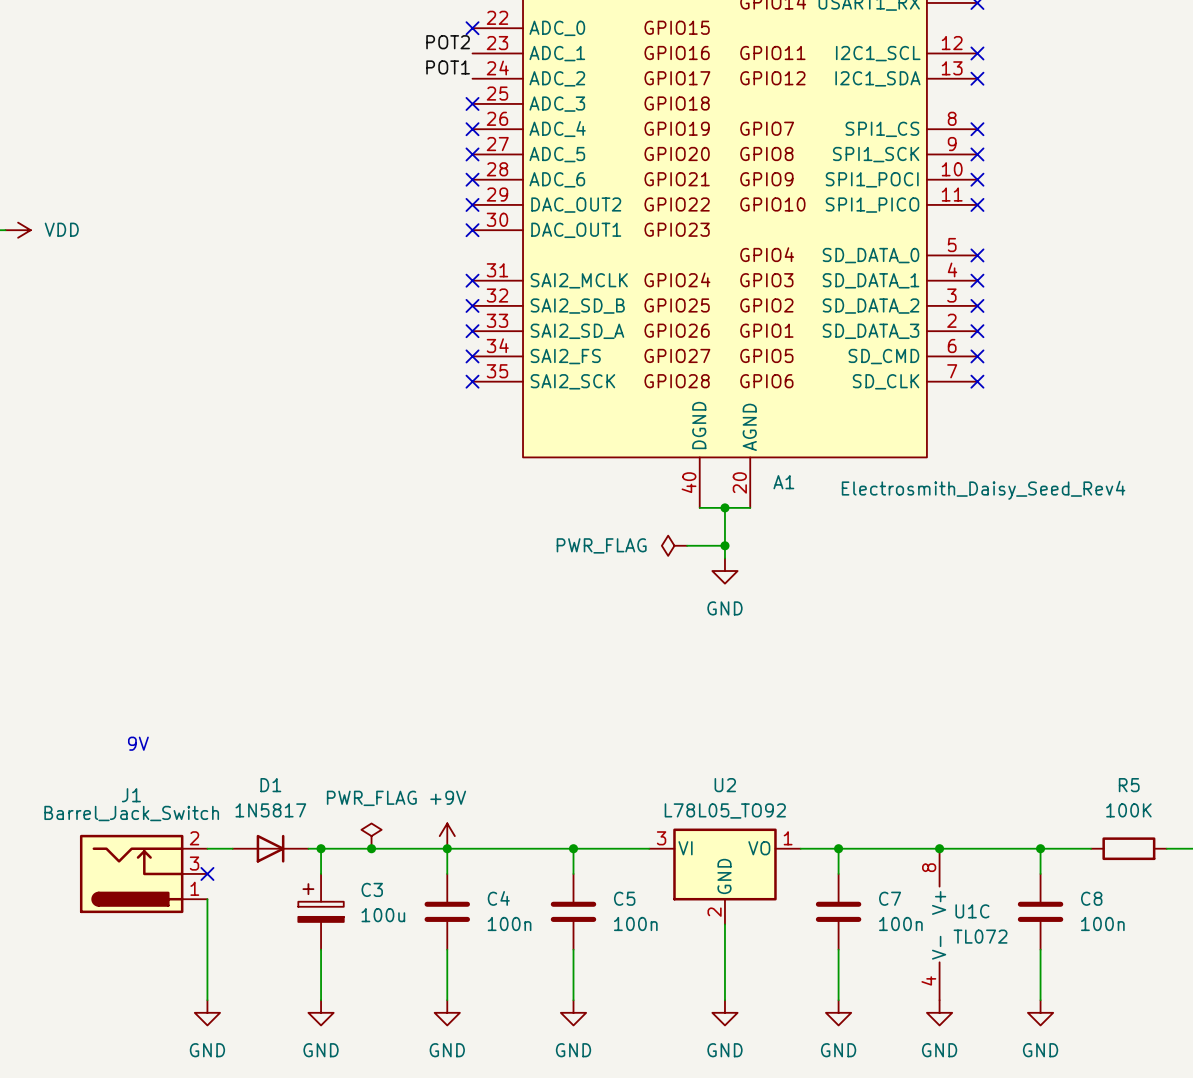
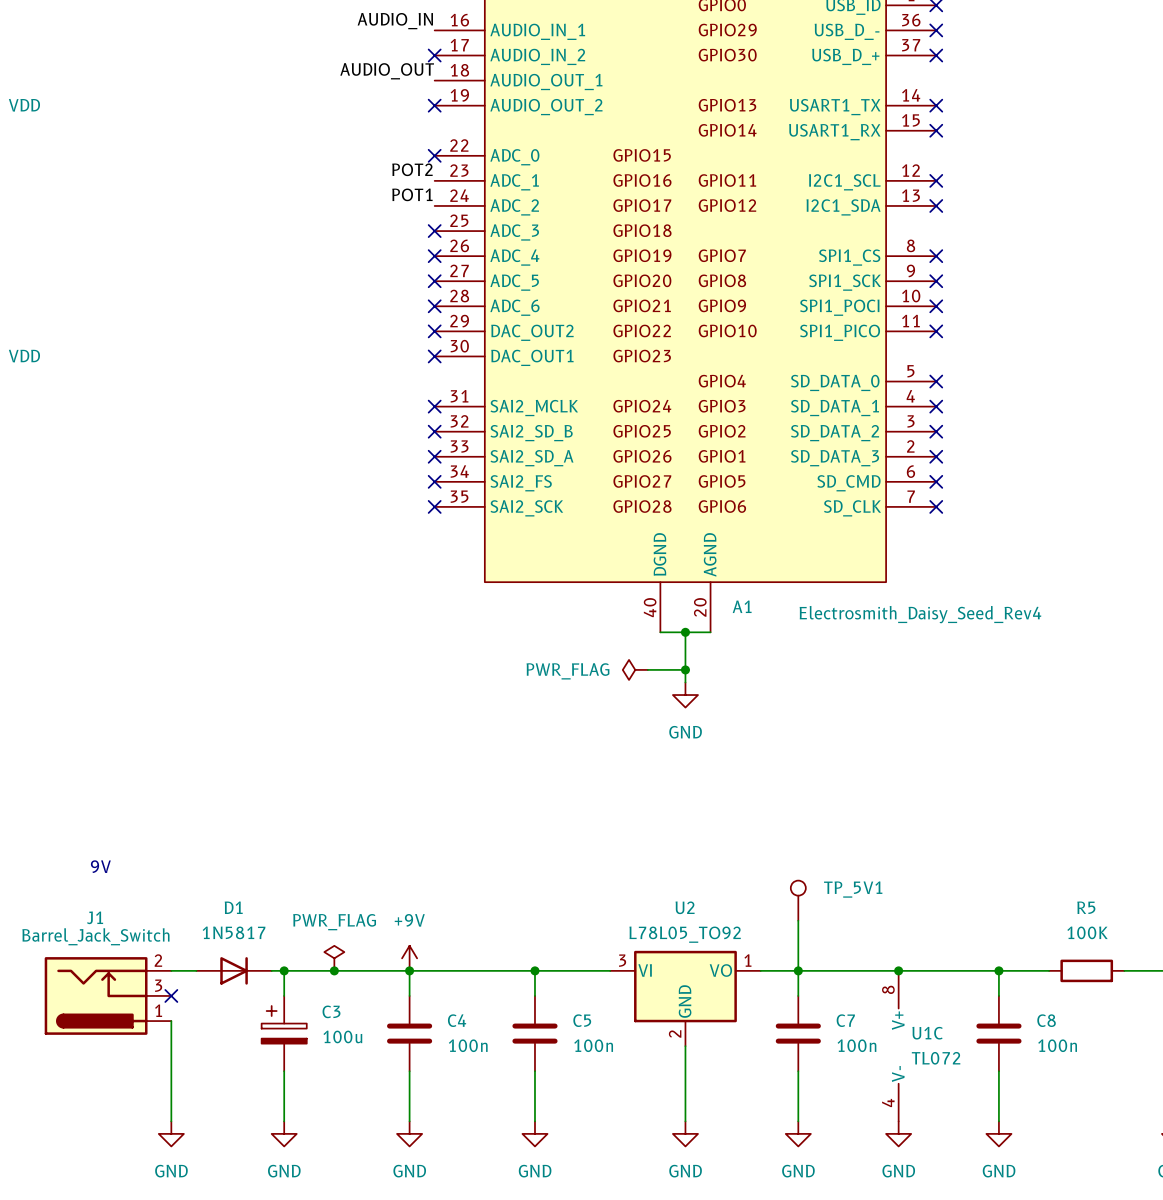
TP_5V1: none -> (798, 900)
wire: none -> (798, 920) (798, 970)

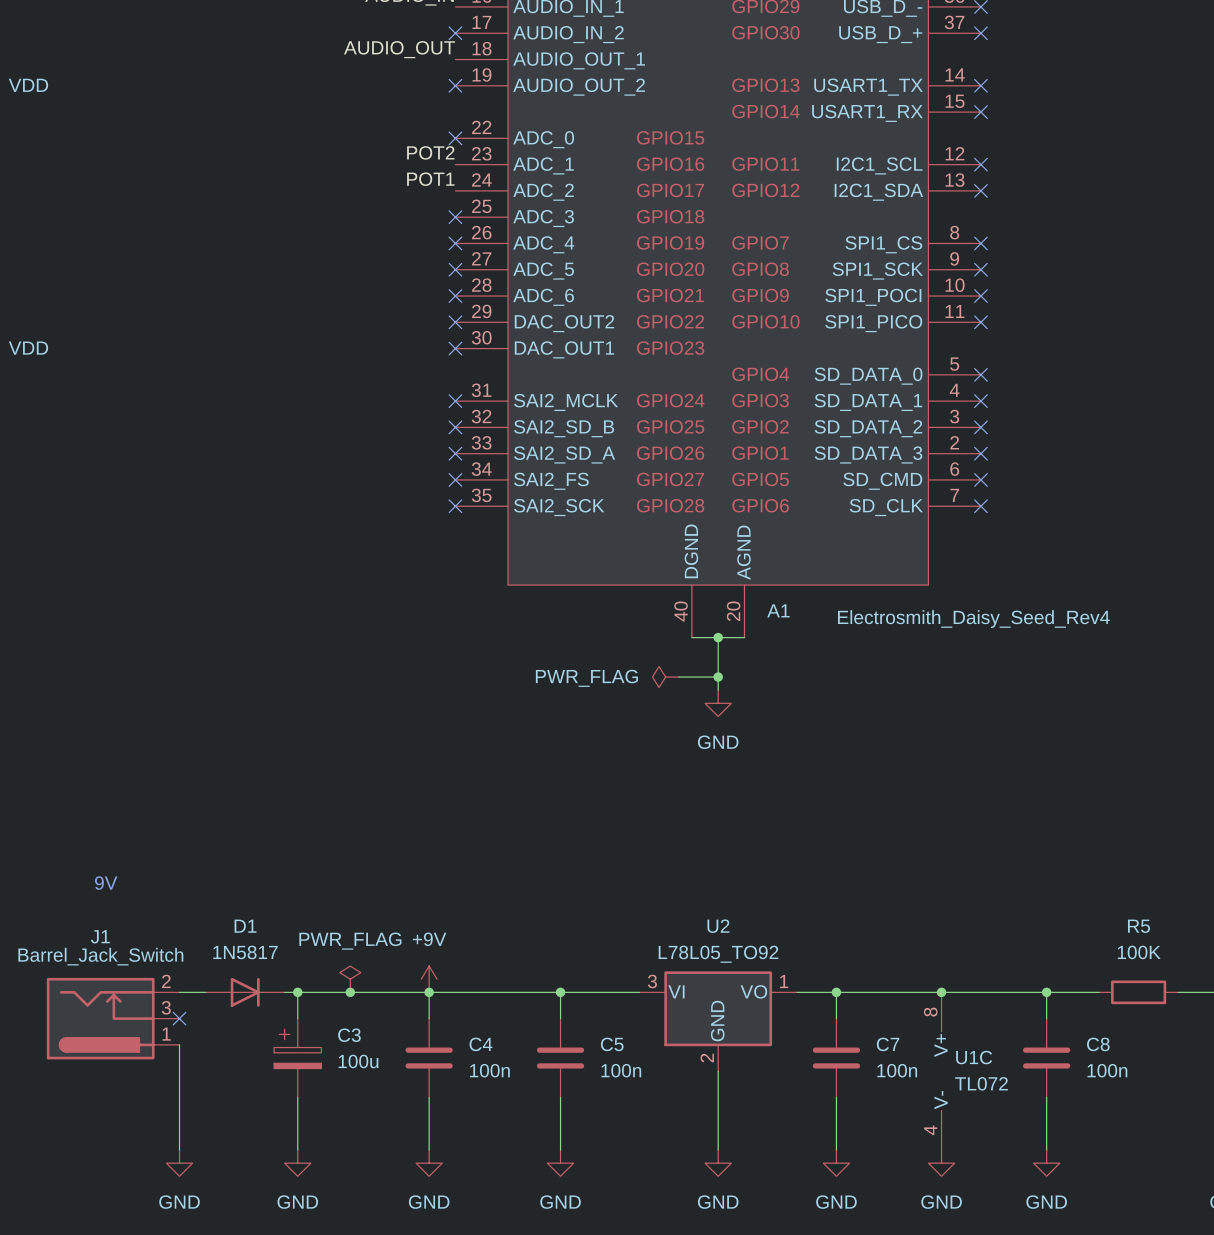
TP_5V1: (798, 900) -> none
wire: (798, 920) (798, 970) -> none

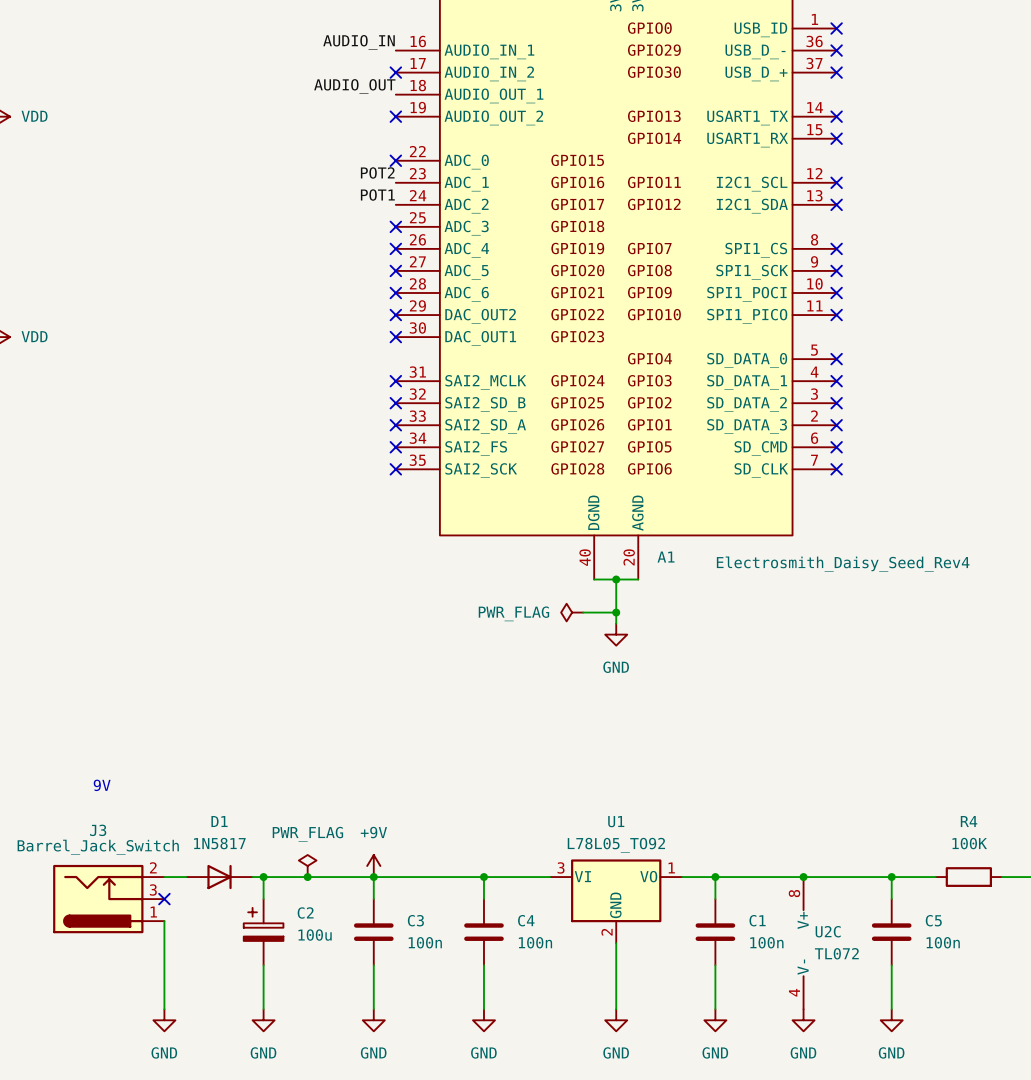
U2 name: U2 (718, 926) -> U1 (616, 821)
R5 name: R5 (1139, 926) -> R4 (969, 821)
J1 name: J1 (100, 936) -> J3 (98, 830)
C3 name: C3 (349, 1035) -> C2 (305, 912)
C4 name: C4 (480, 1044) -> C3 (415, 920)
C5 name: C5 (612, 1044) -> C4 (526, 920)
C7 name: C7 (888, 1044) -> C1 (757, 920)
C8 name: C8 (1098, 1044) -> C5 (933, 920)
U1C name: U1C (974, 1057) -> U2C (828, 931)

